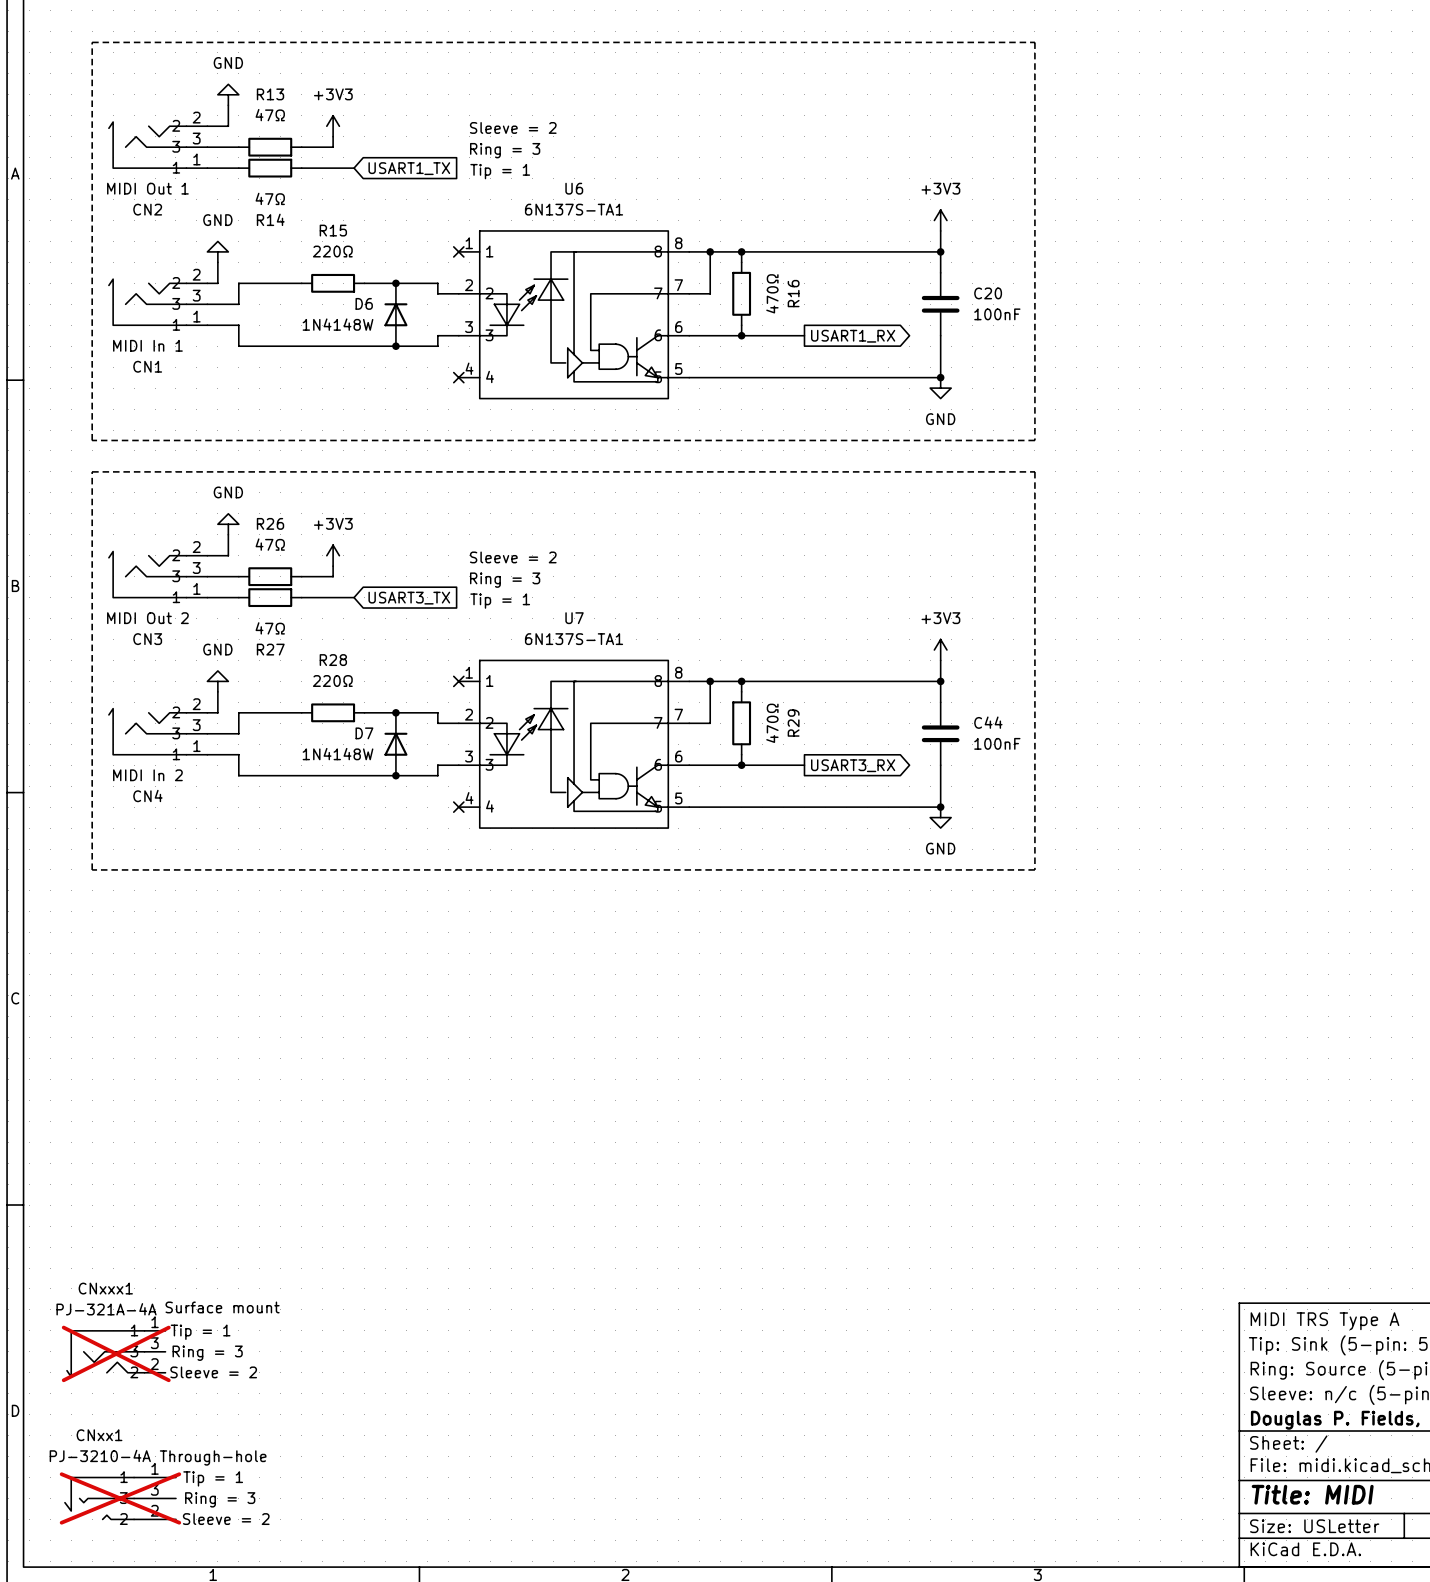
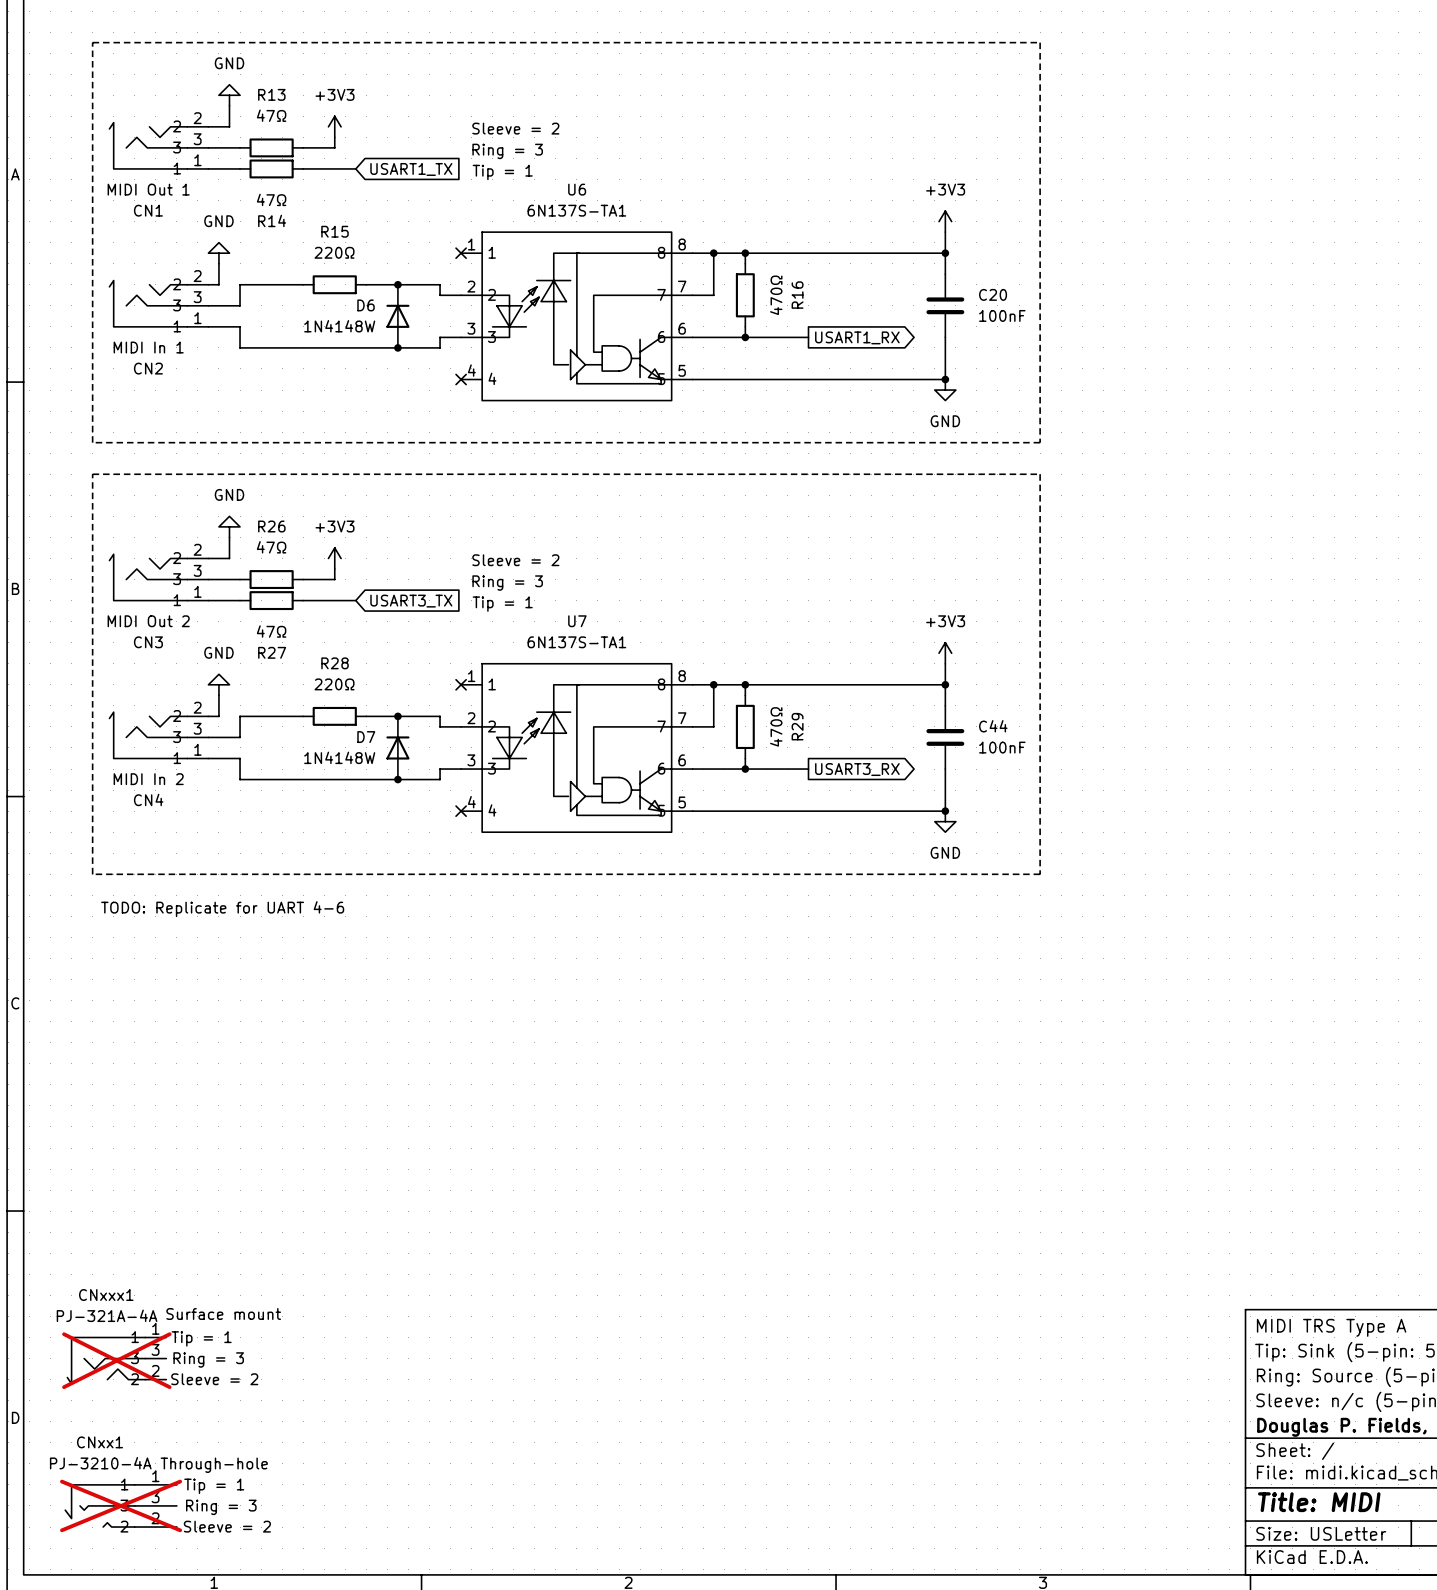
CN2 name: CN2 (147, 209) -> CN1 (148, 210)
CN1 name: CN1 (147, 366) -> CN2 (148, 368)
text: none -> TODO: Replicate for UART 4-6 (222, 909)

